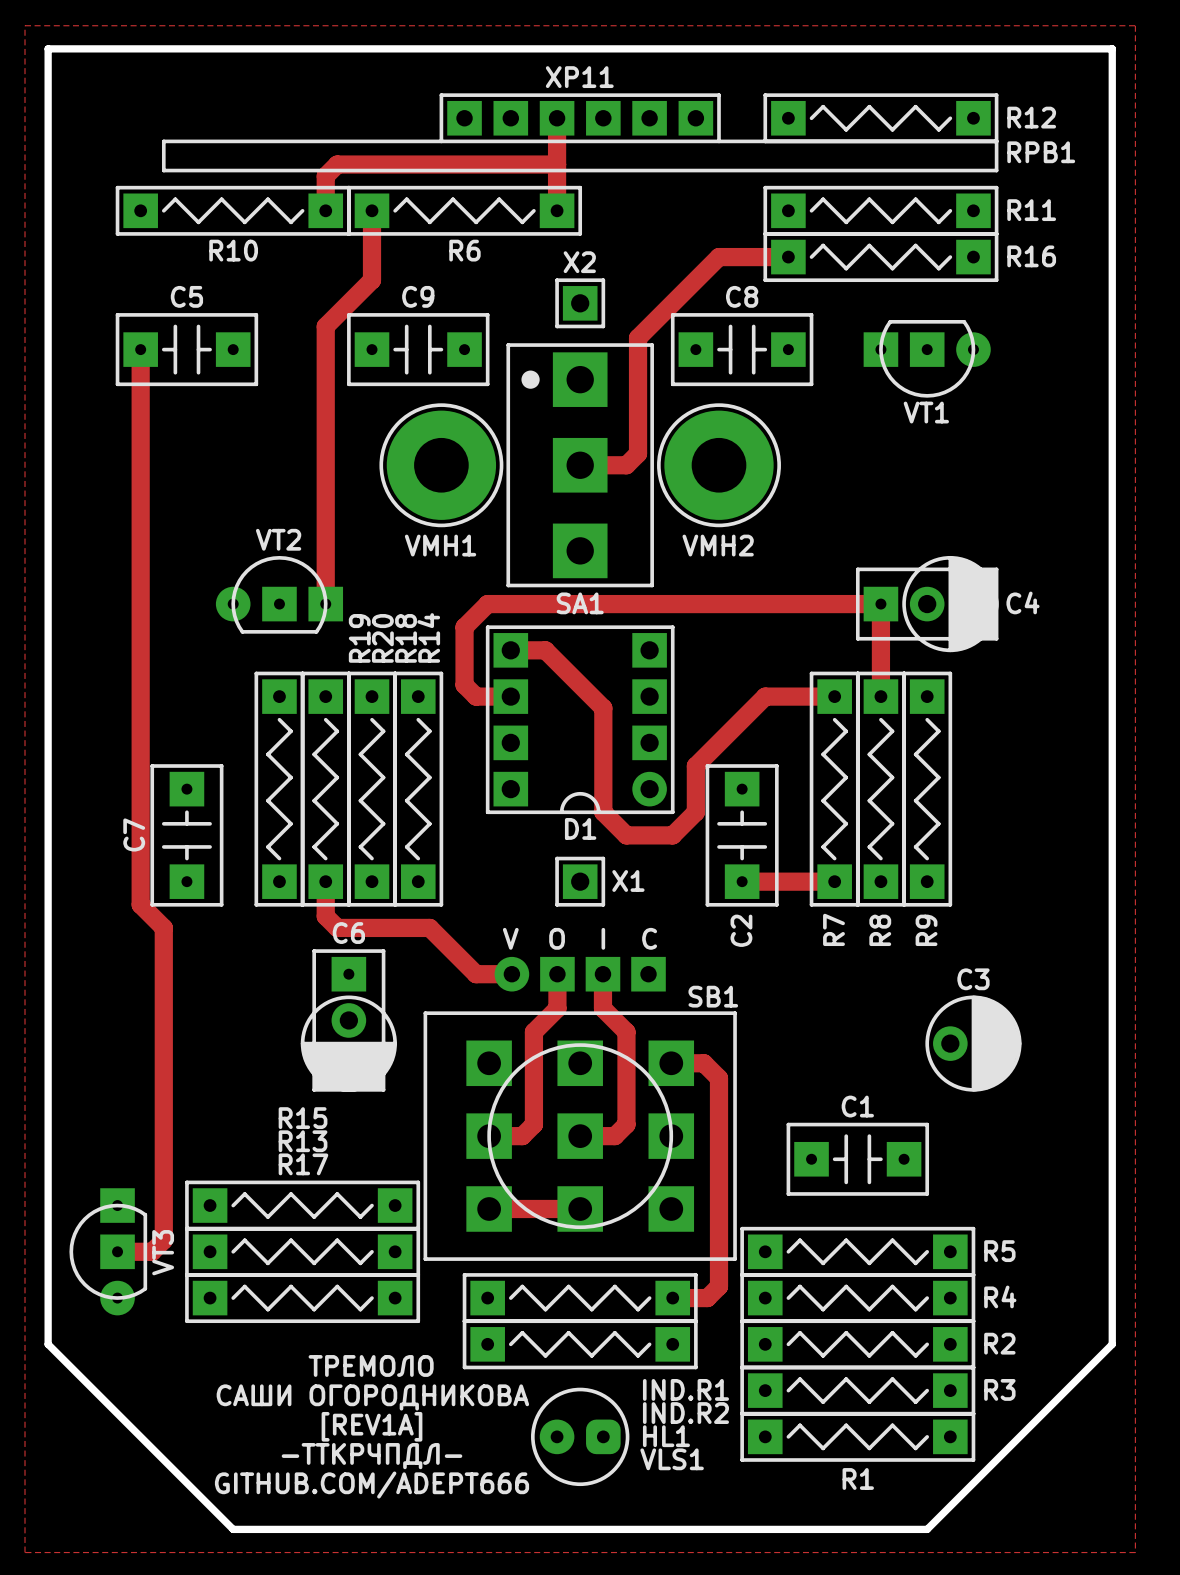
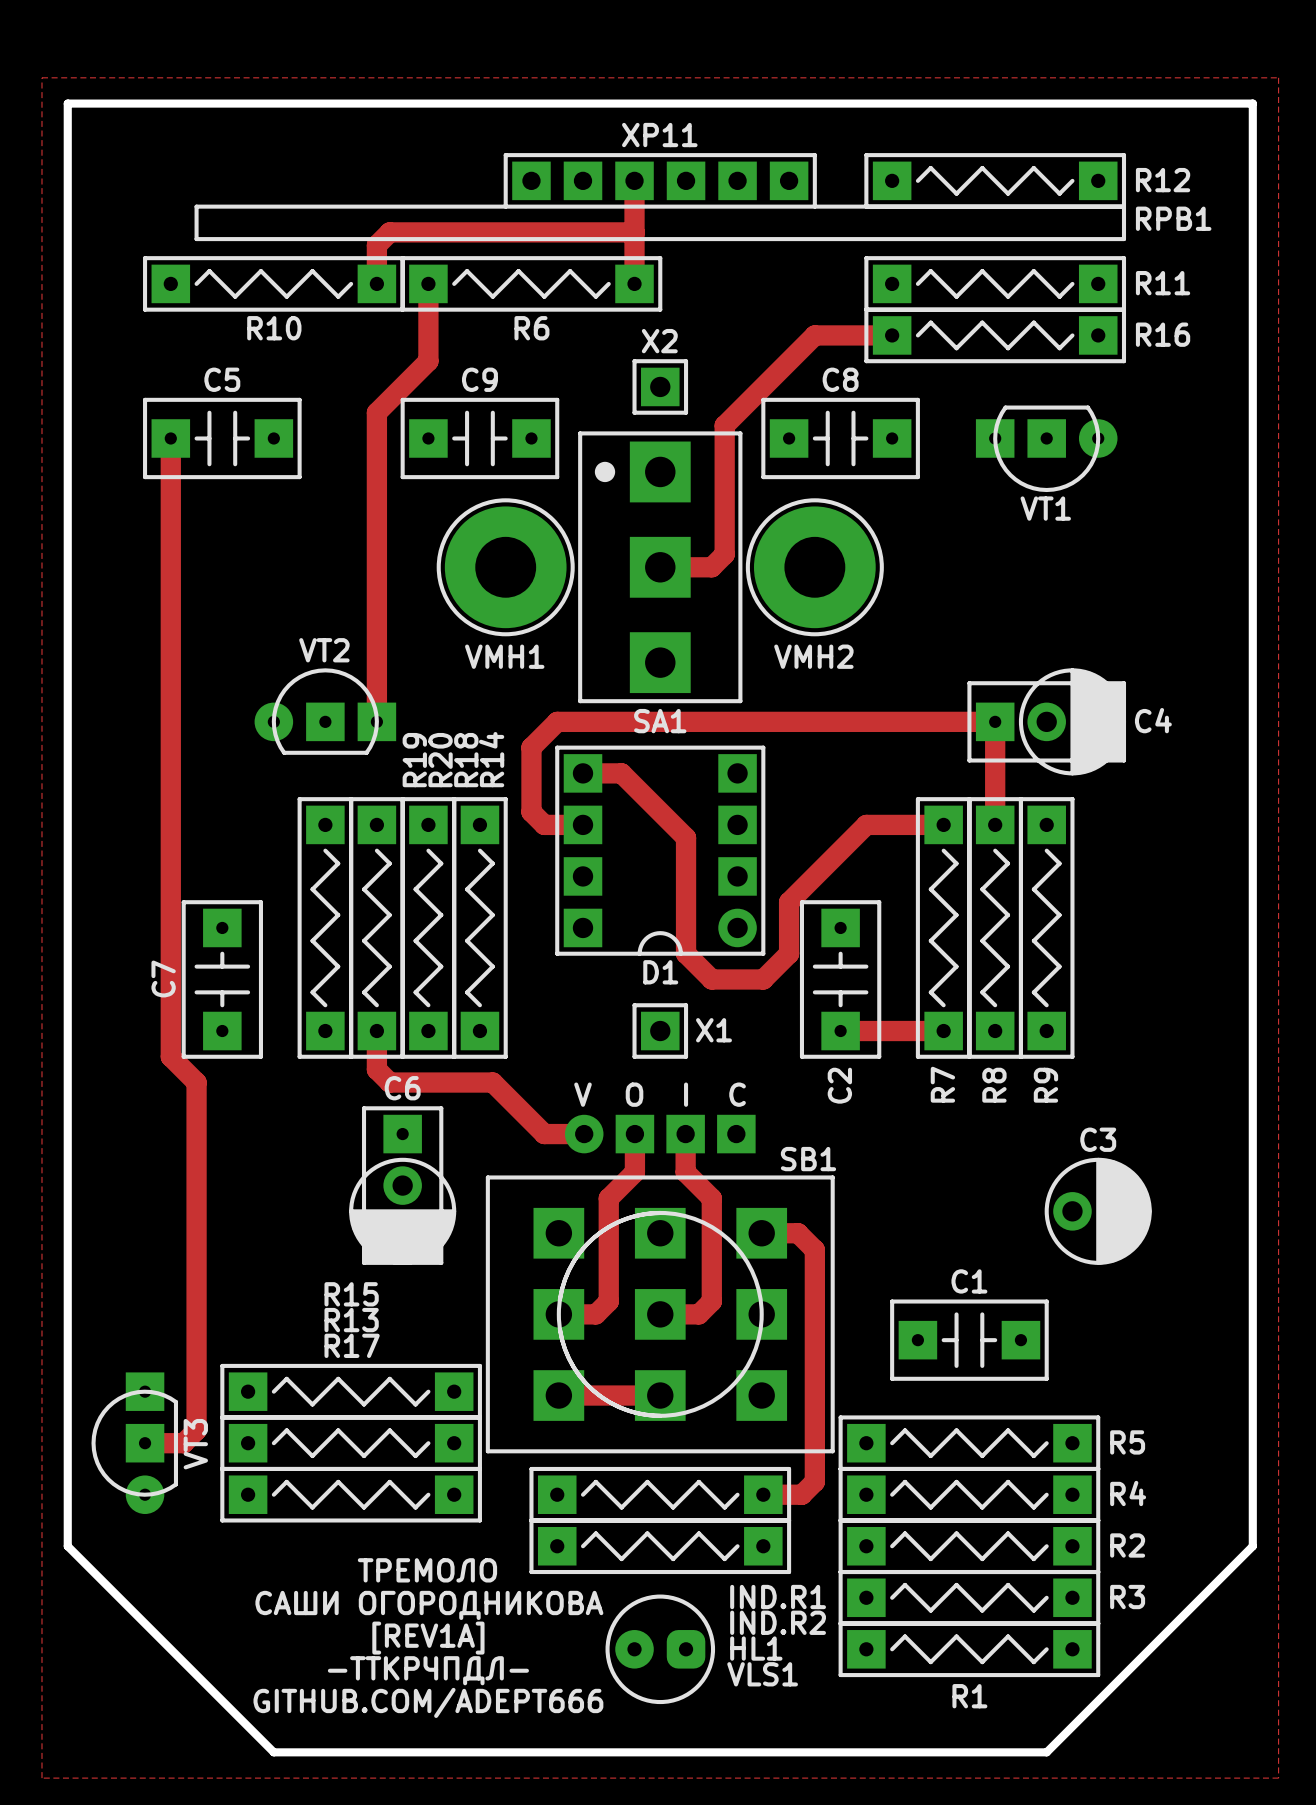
SB1 footprint: [423, 1011, 737, 1261] -> [485, 1175, 835, 1454]

